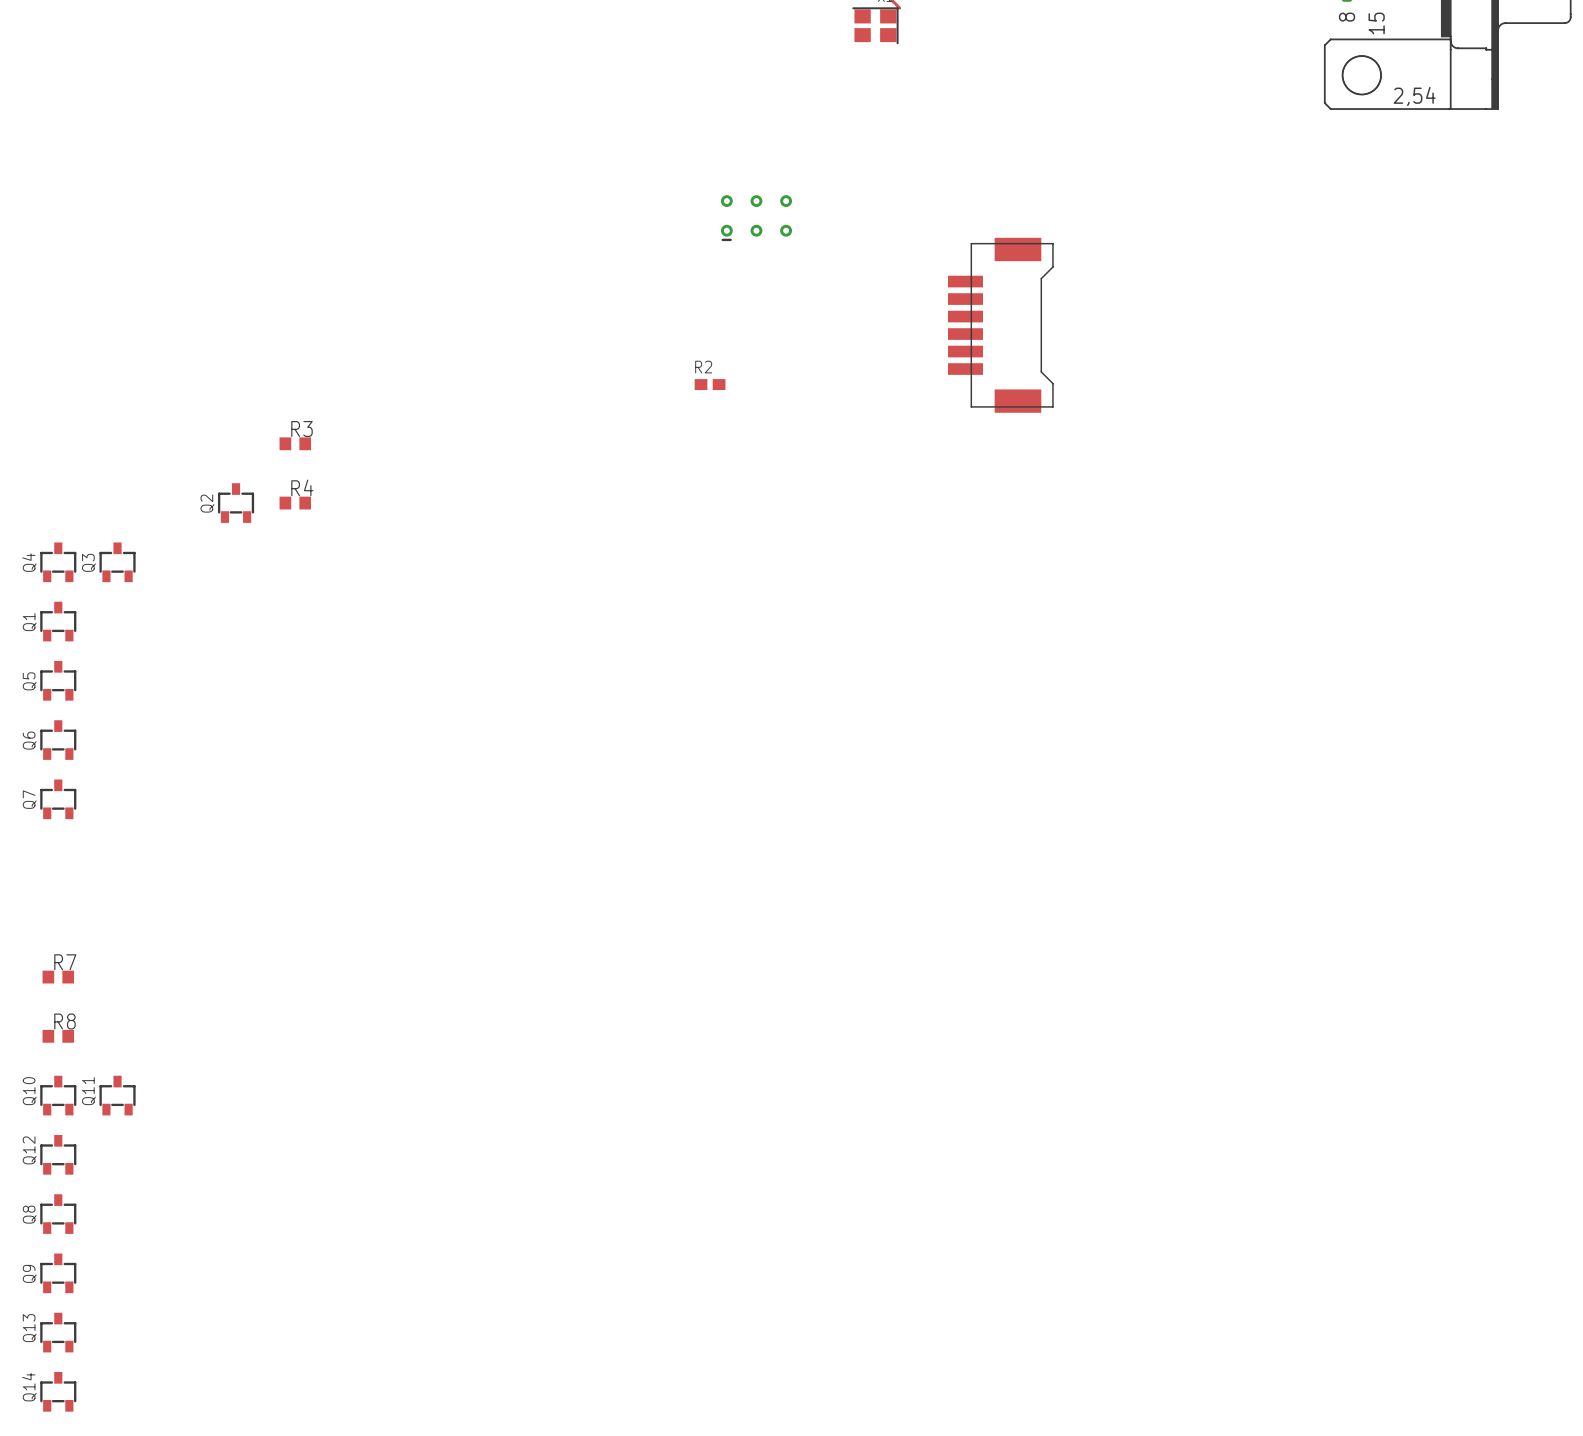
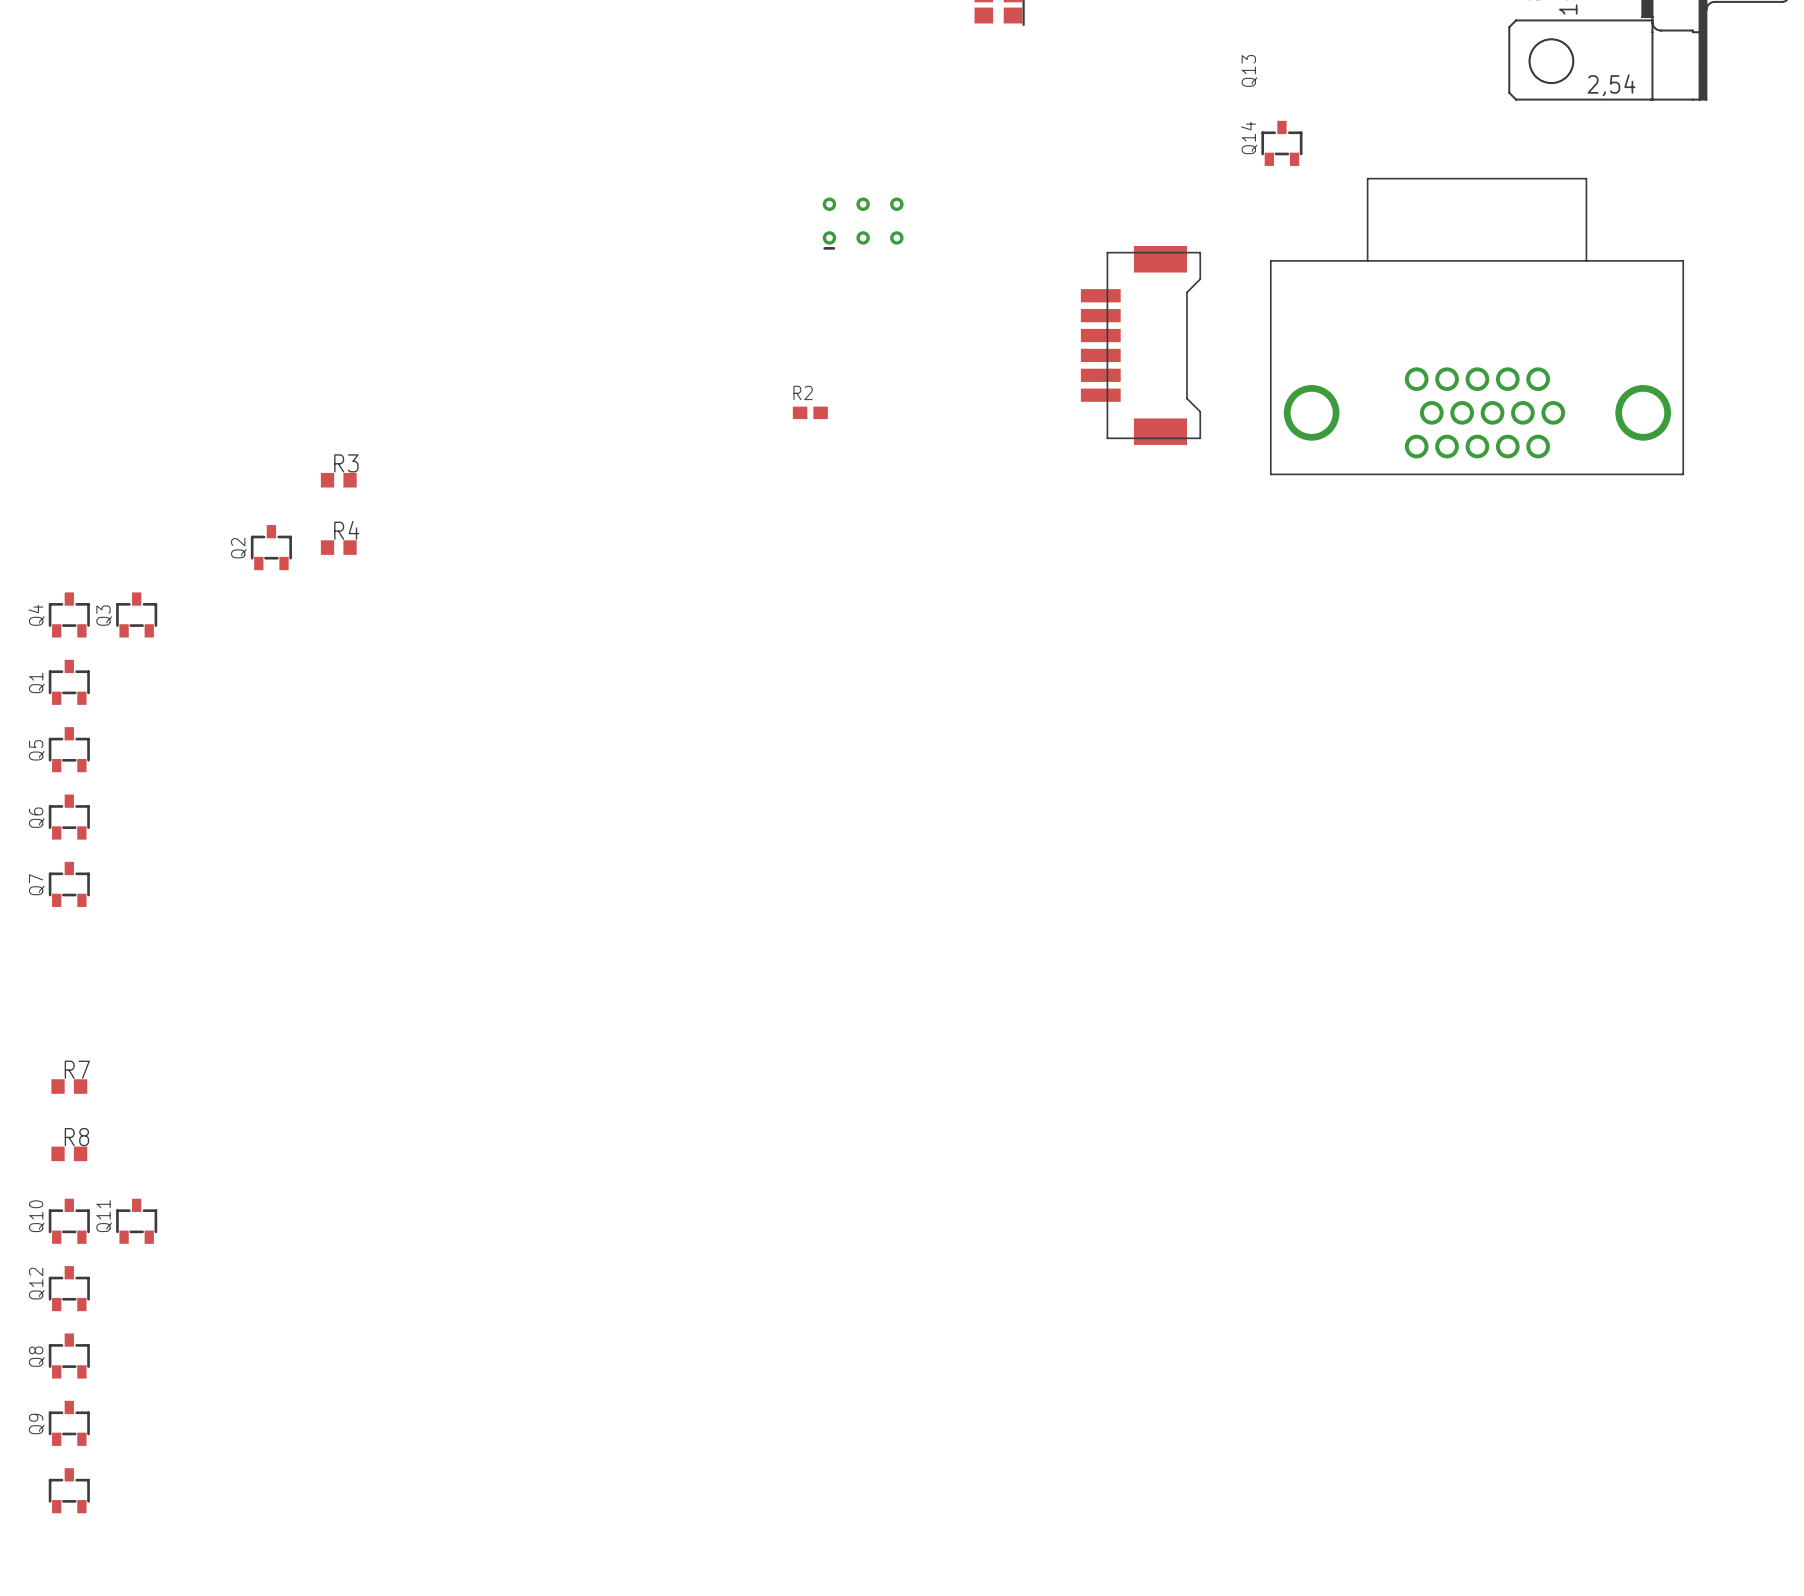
part: none -> (1477, 326)
Q13 name position: Q13 (29, 1328) -> Q13 (1249, 70)
Q14 position: (58, 1391) -> (1281, 143)

